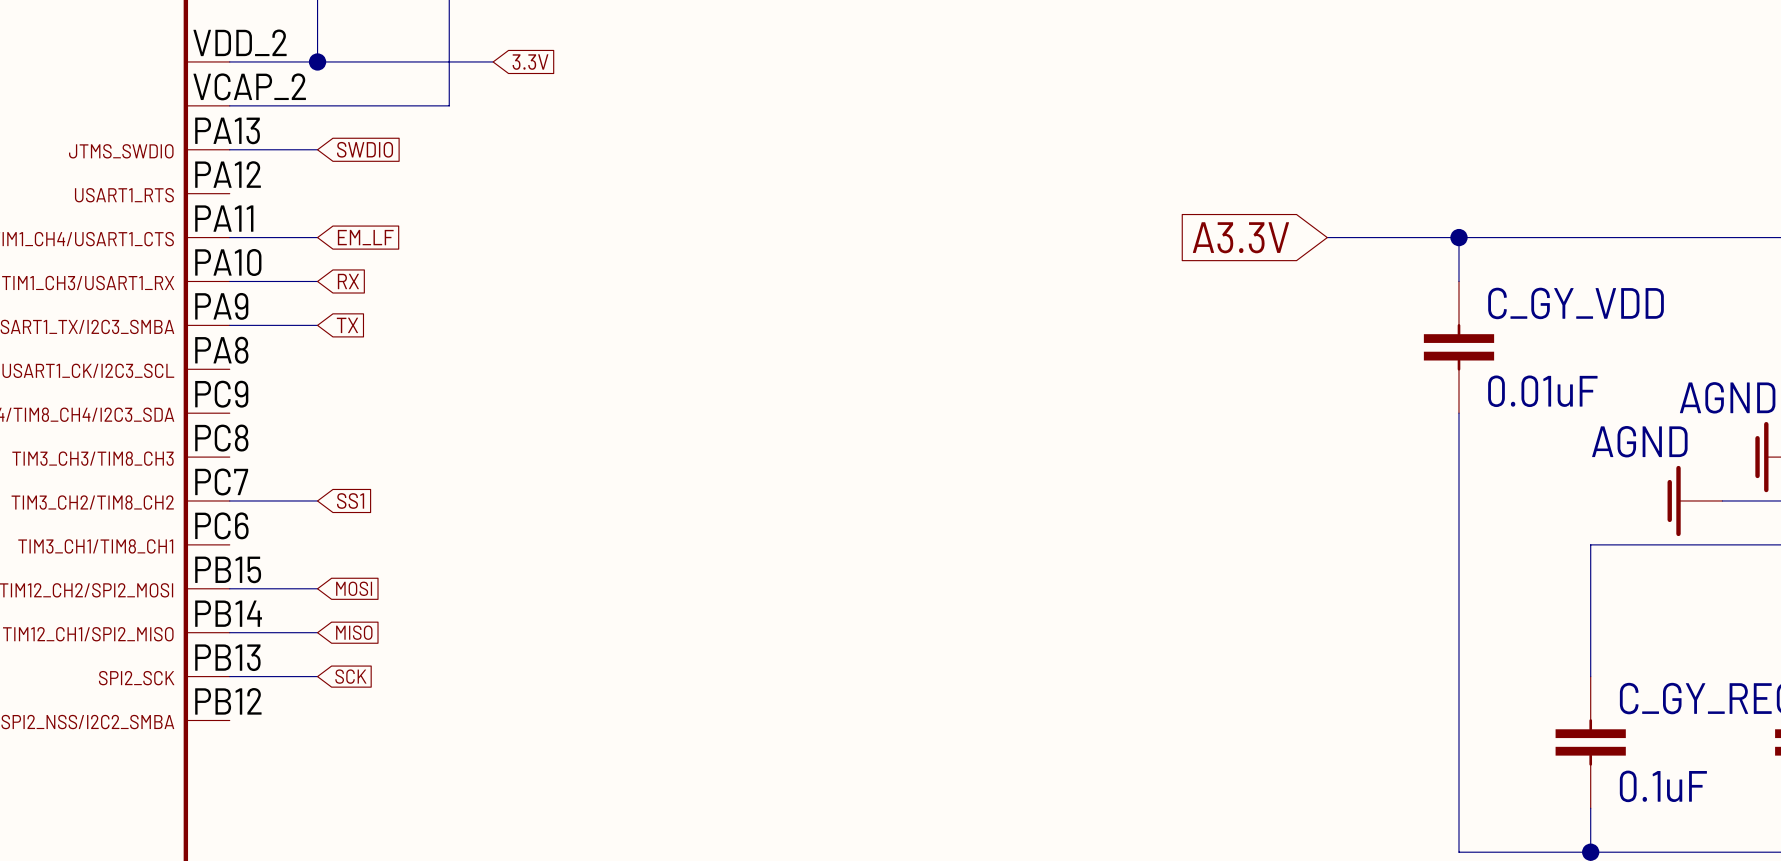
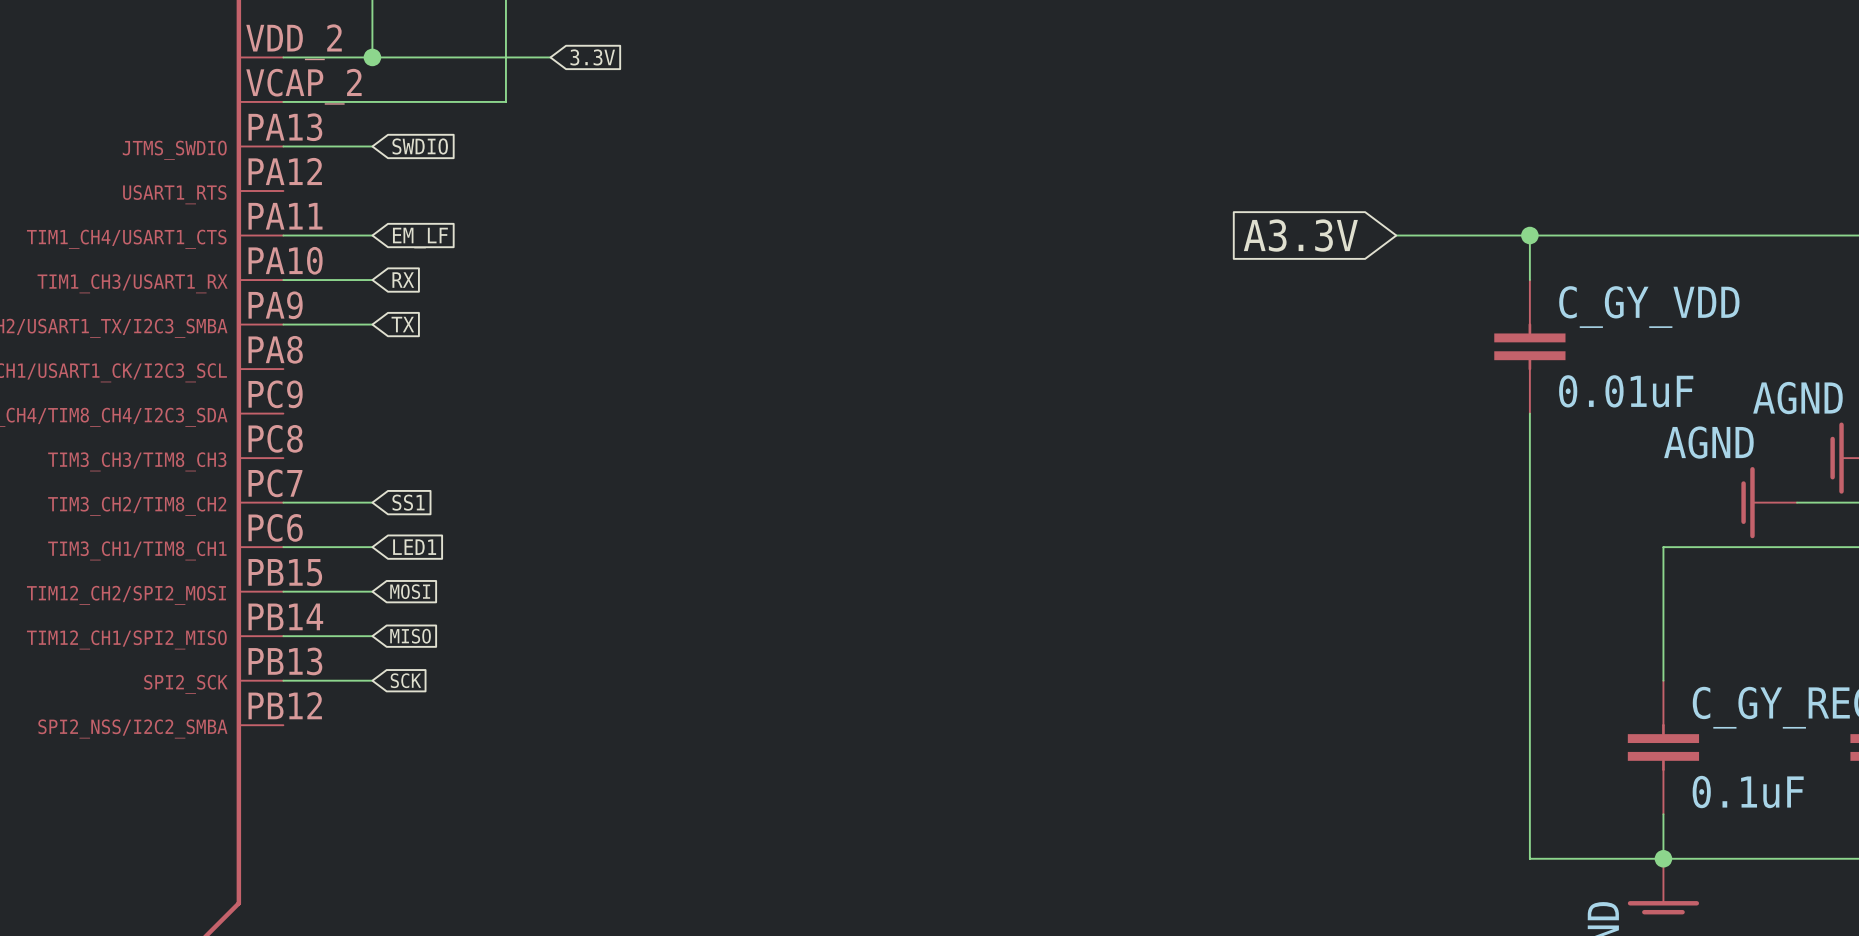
wire: none -> (283, 547) (372, 547)
global label: none -> LED1 (414, 547)

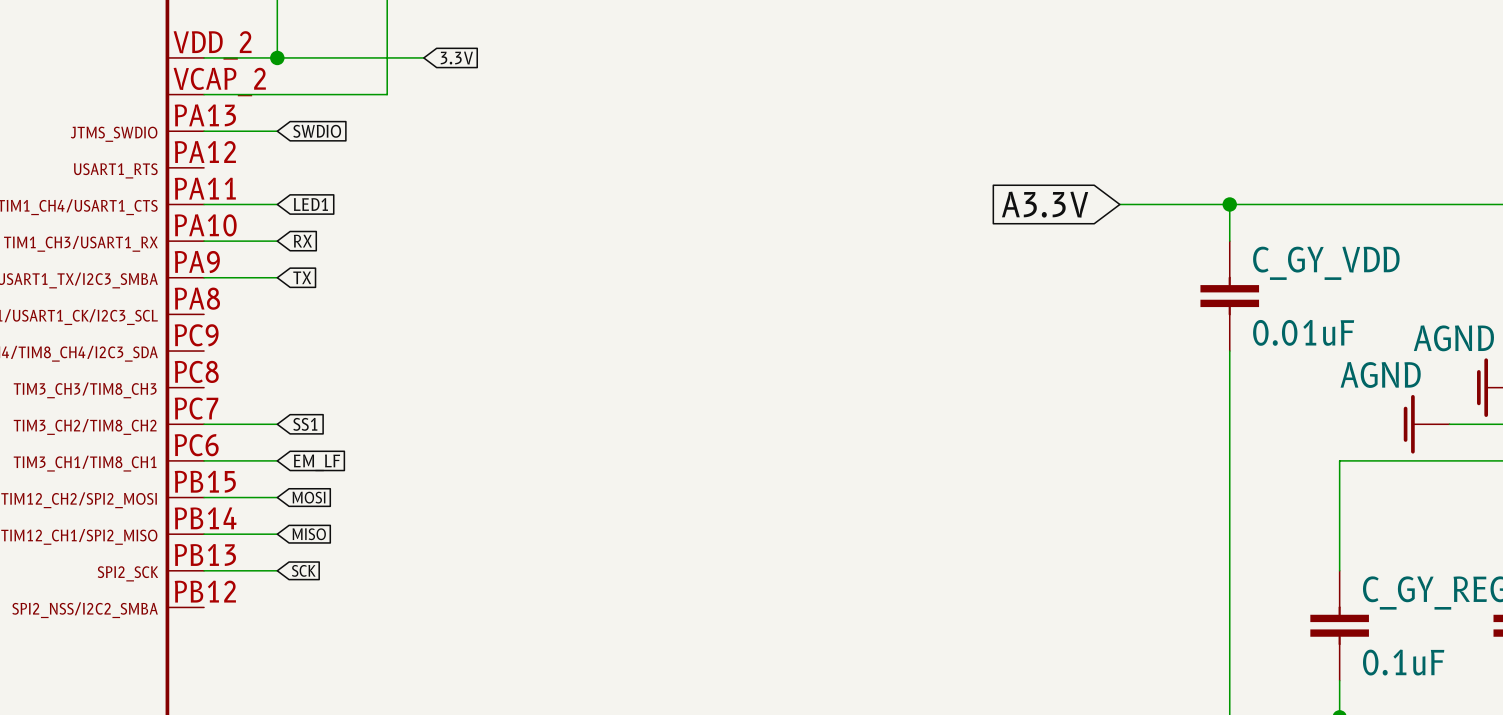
global label: EM_LF (420, 238) -> LED1 (310, 204)
global label: LED1 (414, 547) -> EM_LF (317, 462)

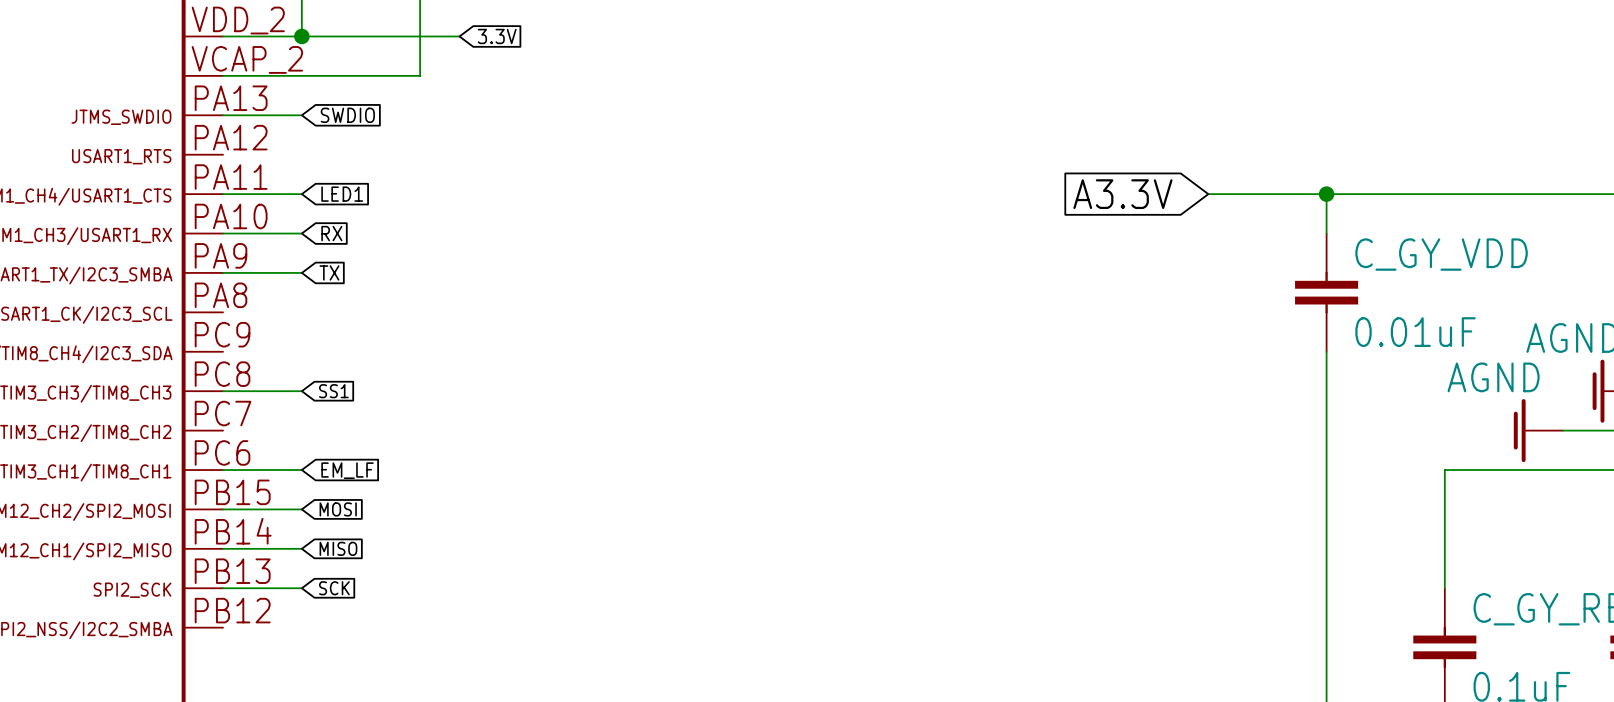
wire: (204, 424) (277, 424) -> (223, 391) (301, 391)
global label position: SS1 (305, 424) -> SS1 (333, 391)

